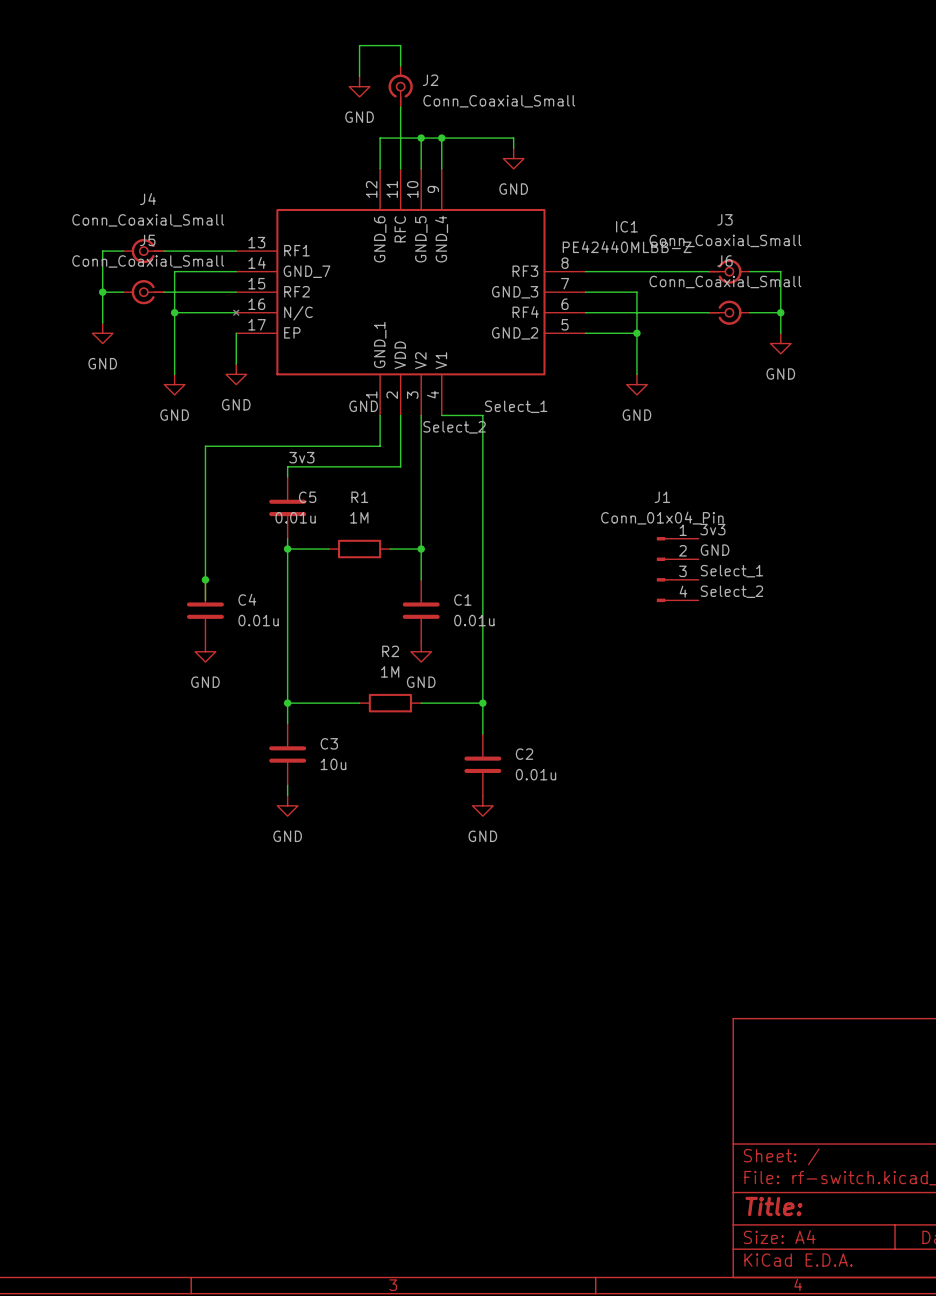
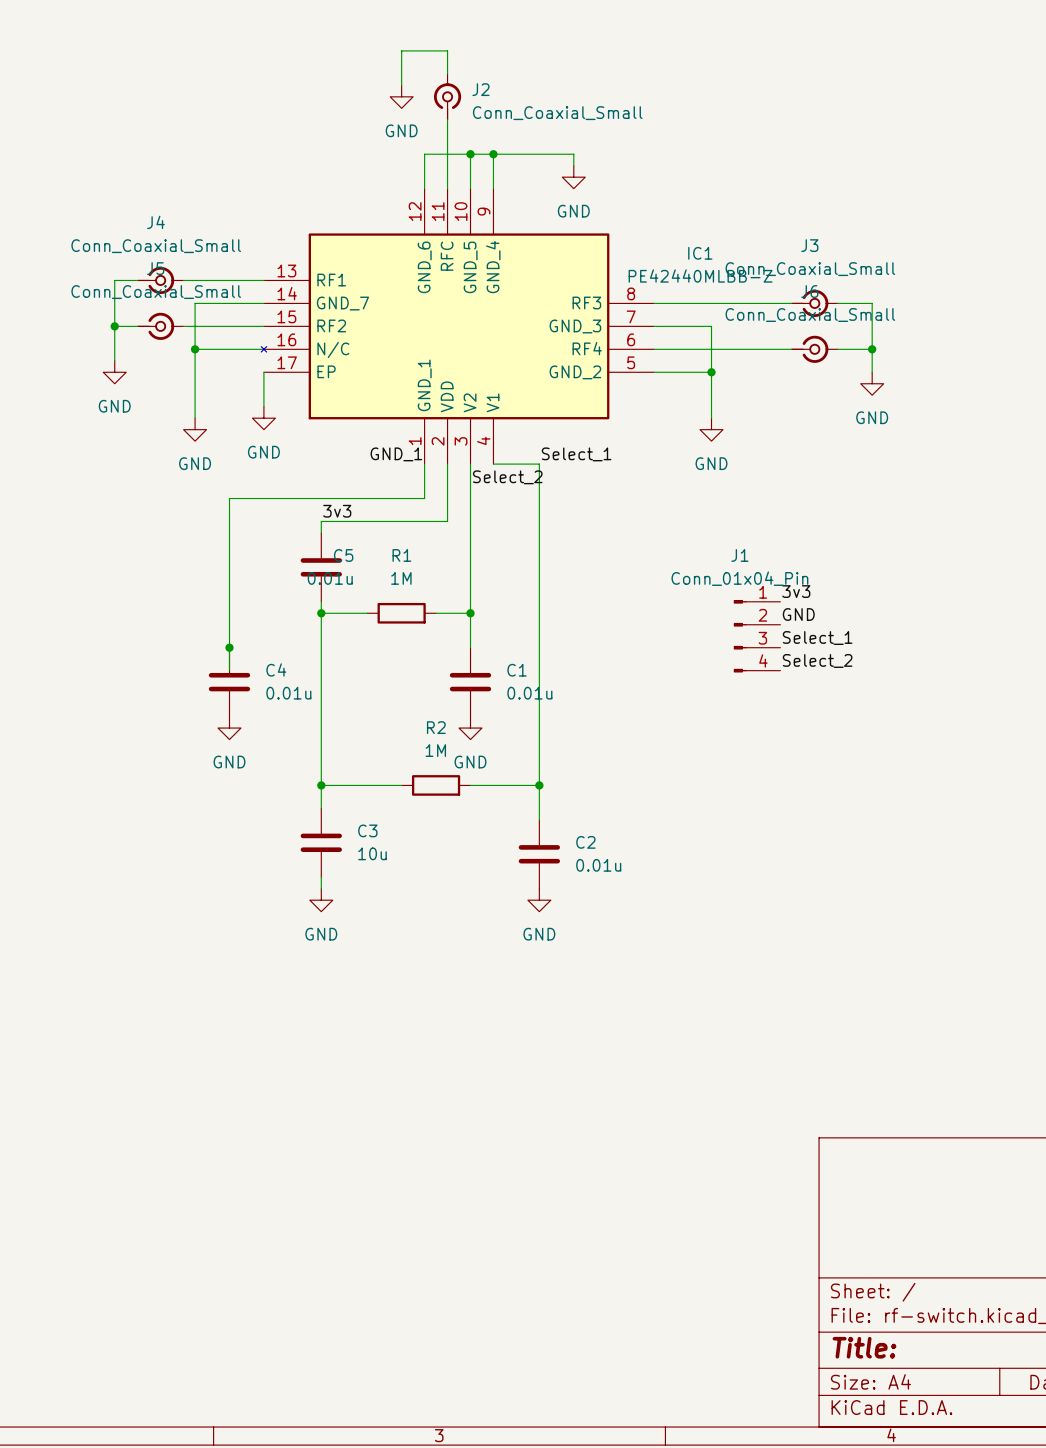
J4 rotation: 0° (148, 251) -> 180° (155, 280)
J5 rotation: 0° (148, 292) -> 180° (155, 326)
label: GND (363, 406) -> GND_1 (396, 454)

